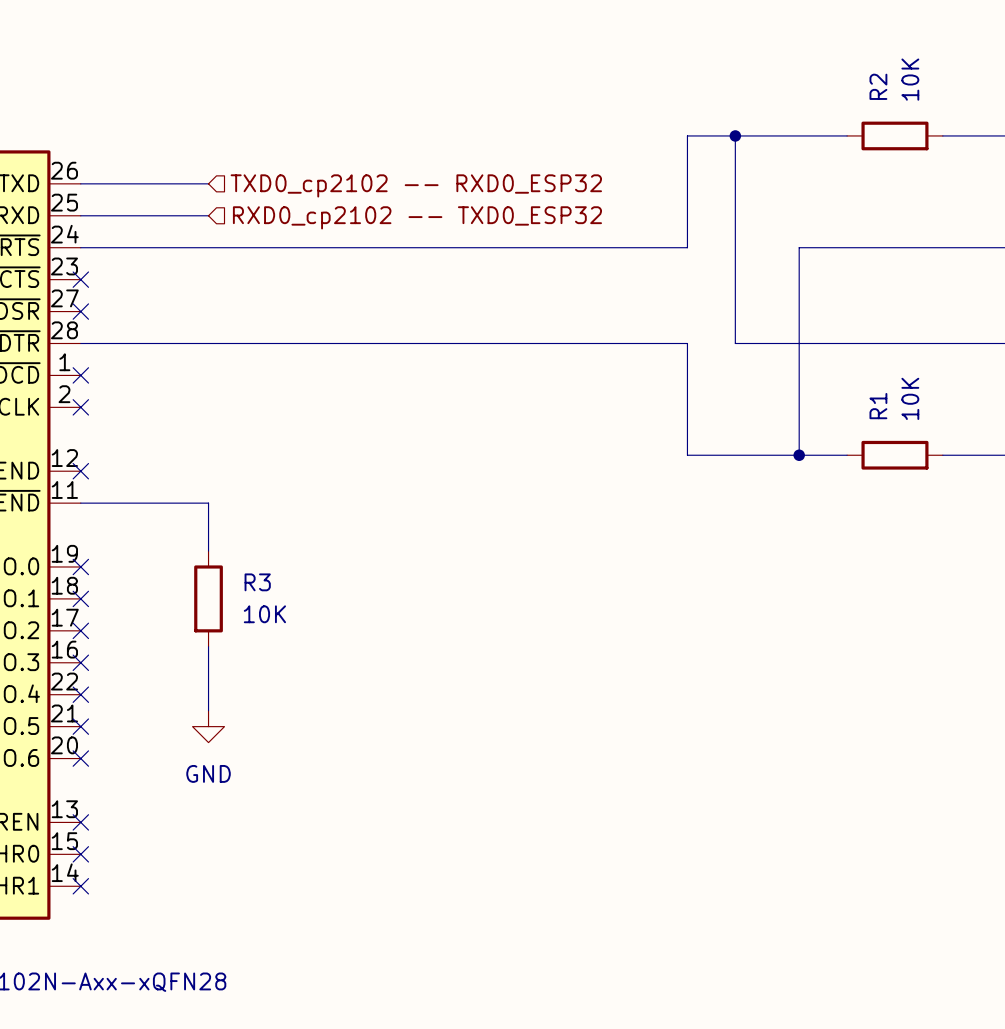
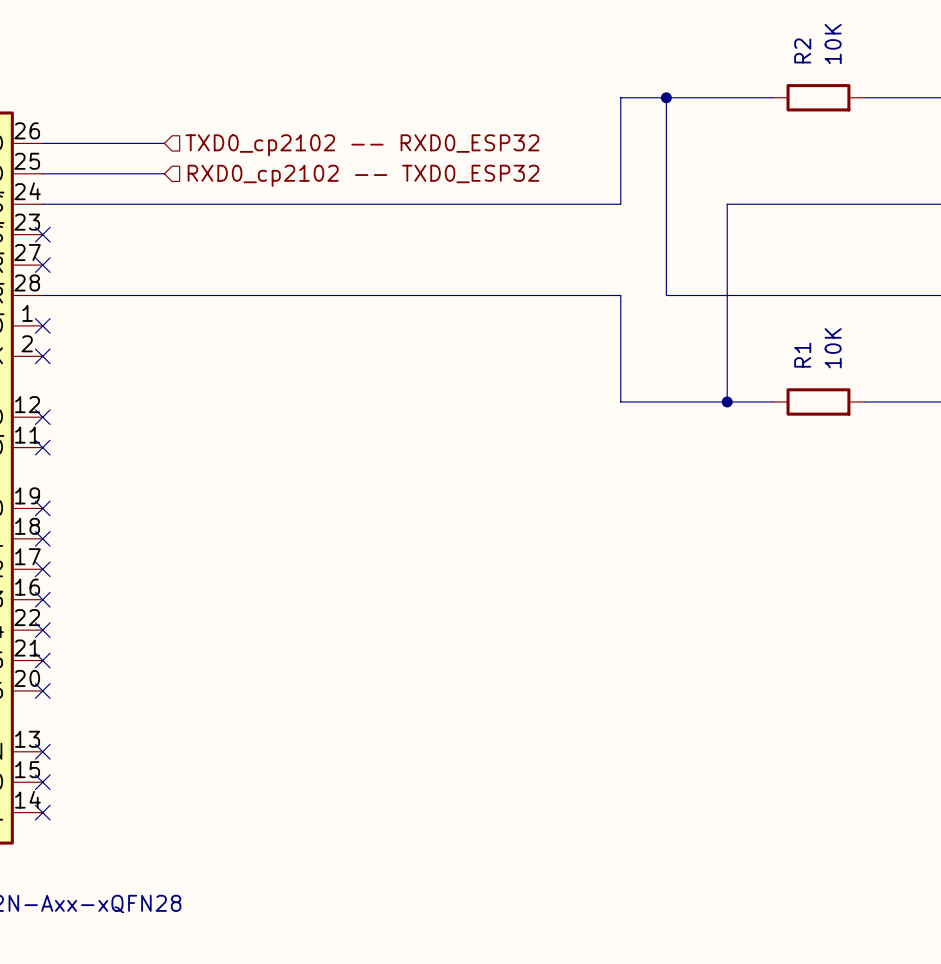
wire: (80, 503) (208, 503) (208, 551) -> none
no-connect mark: none -> (42, 447)
R3: 10K (208, 598) -> none
wire: (208, 646) (208, 710) -> none
power symbol: GND (208, 726) -> none

